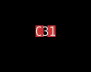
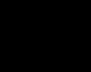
C31: (45, 31) -> none

